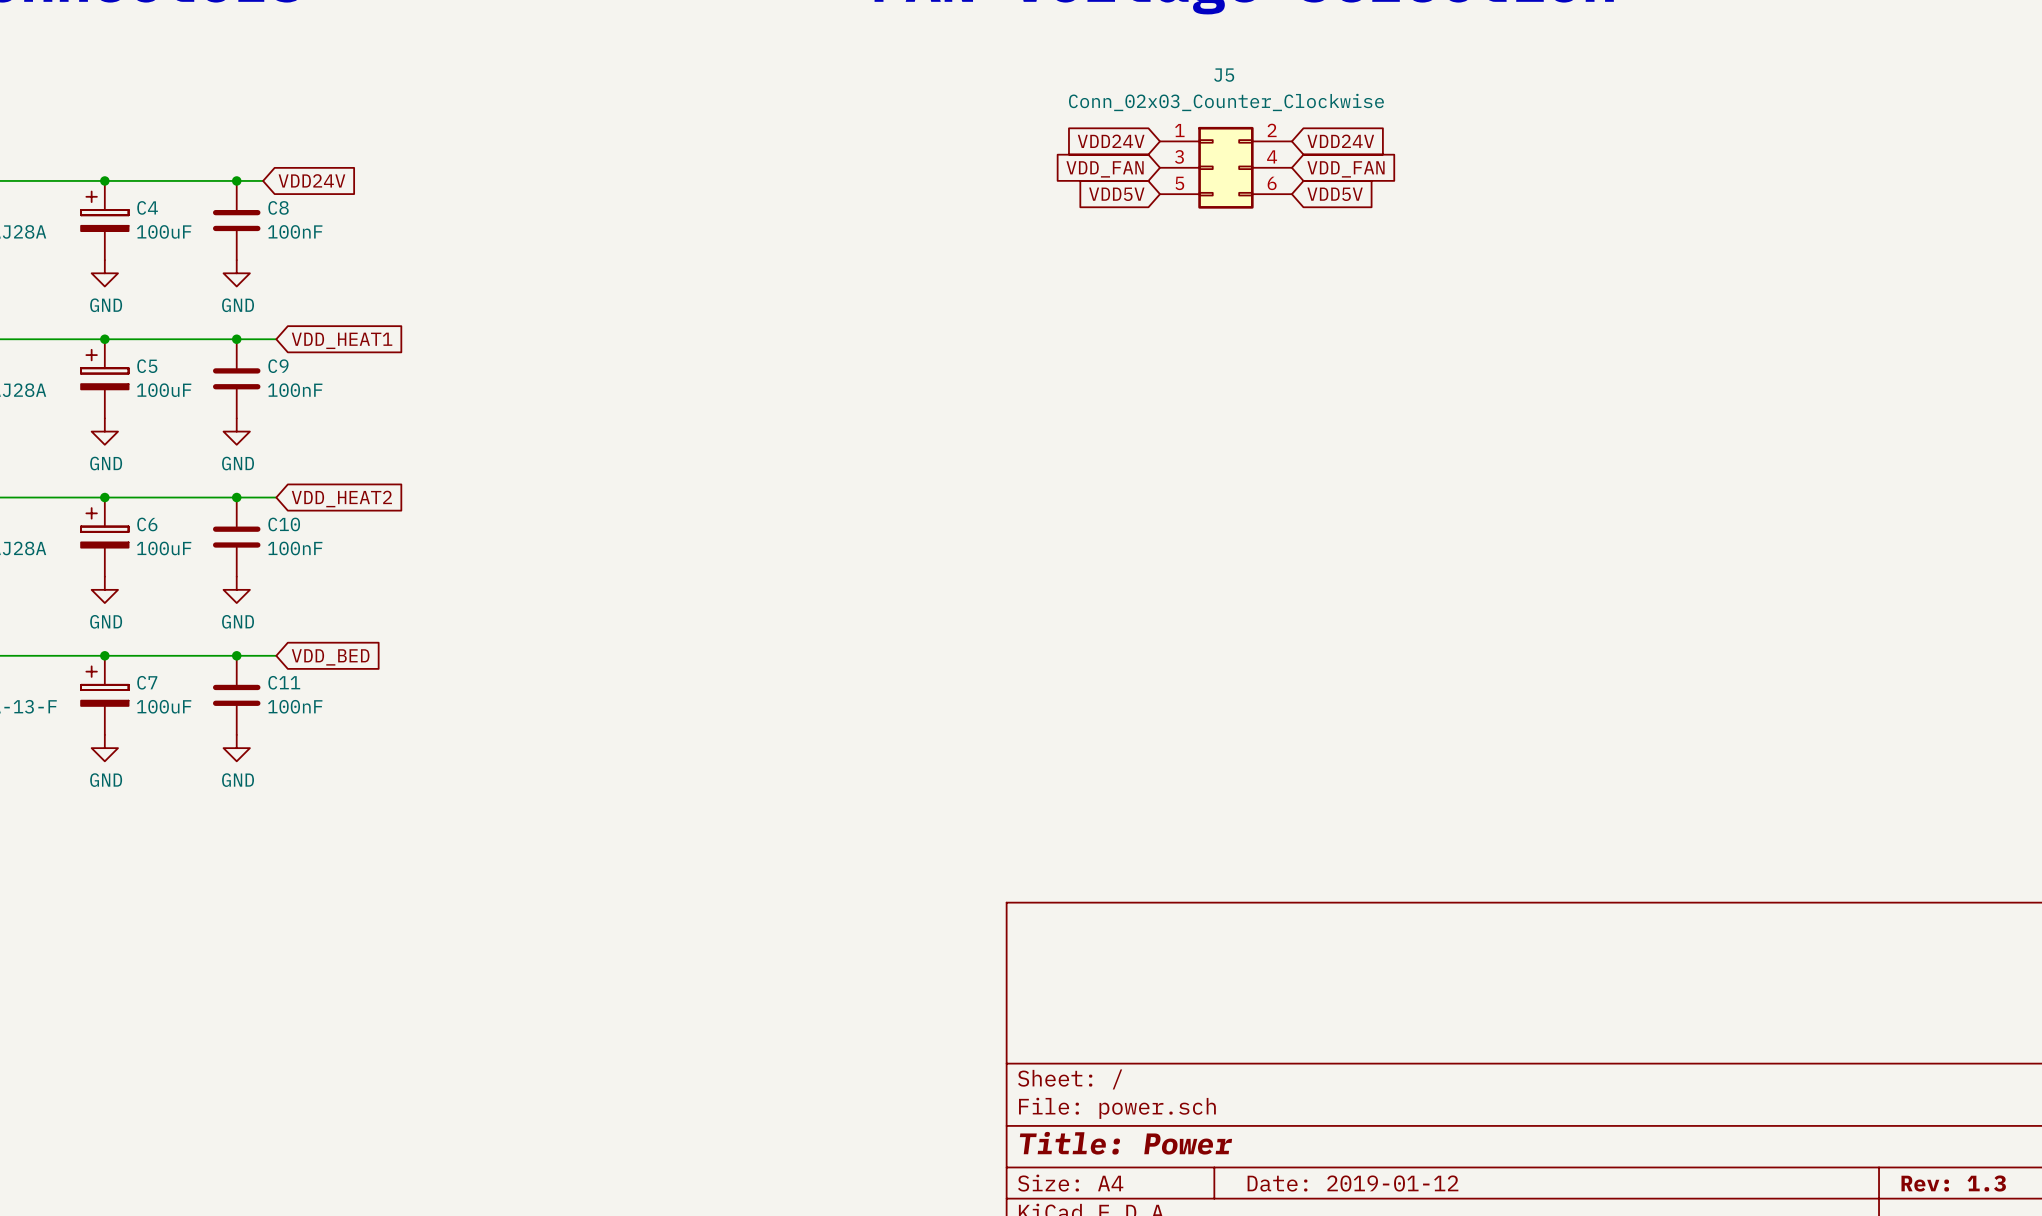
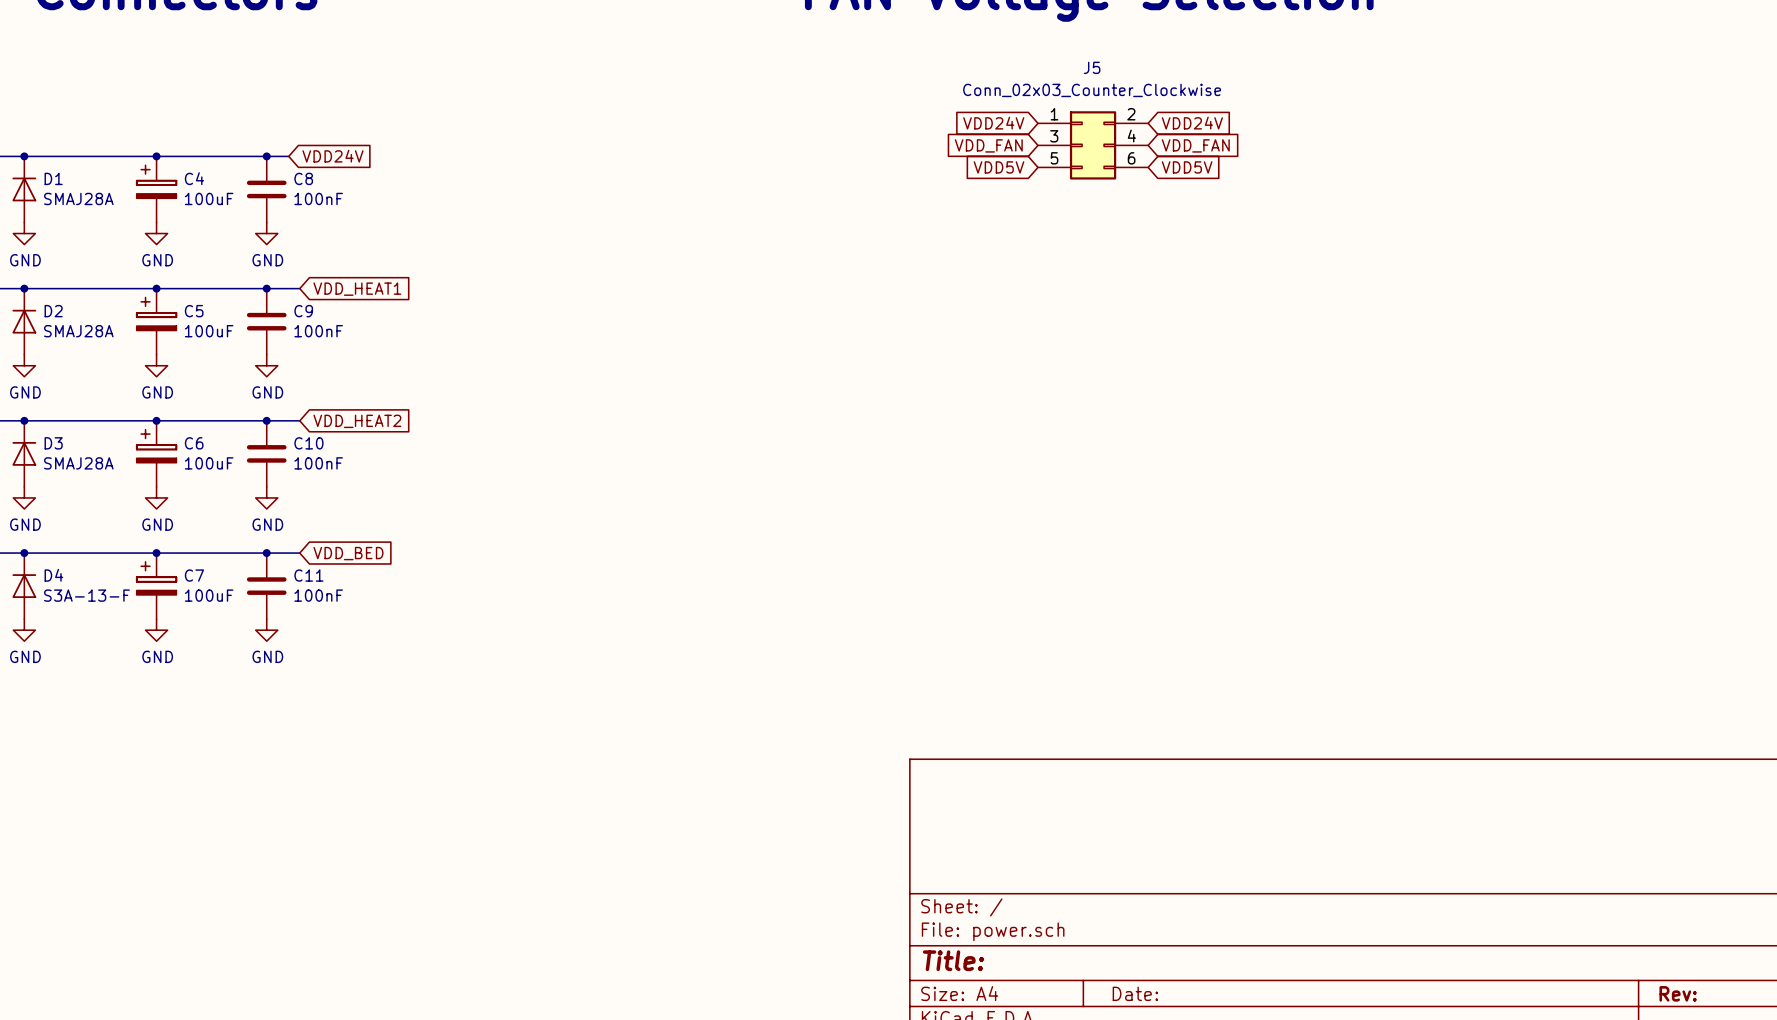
title block: Title: Power (1125, 1143) -> Title: (953, 960)
title block: Date: 2019-01-12 (1352, 1183) -> Date: (1135, 993)
title block: Rev: 1.3 (1953, 1183) -> Rev: (1678, 993)

